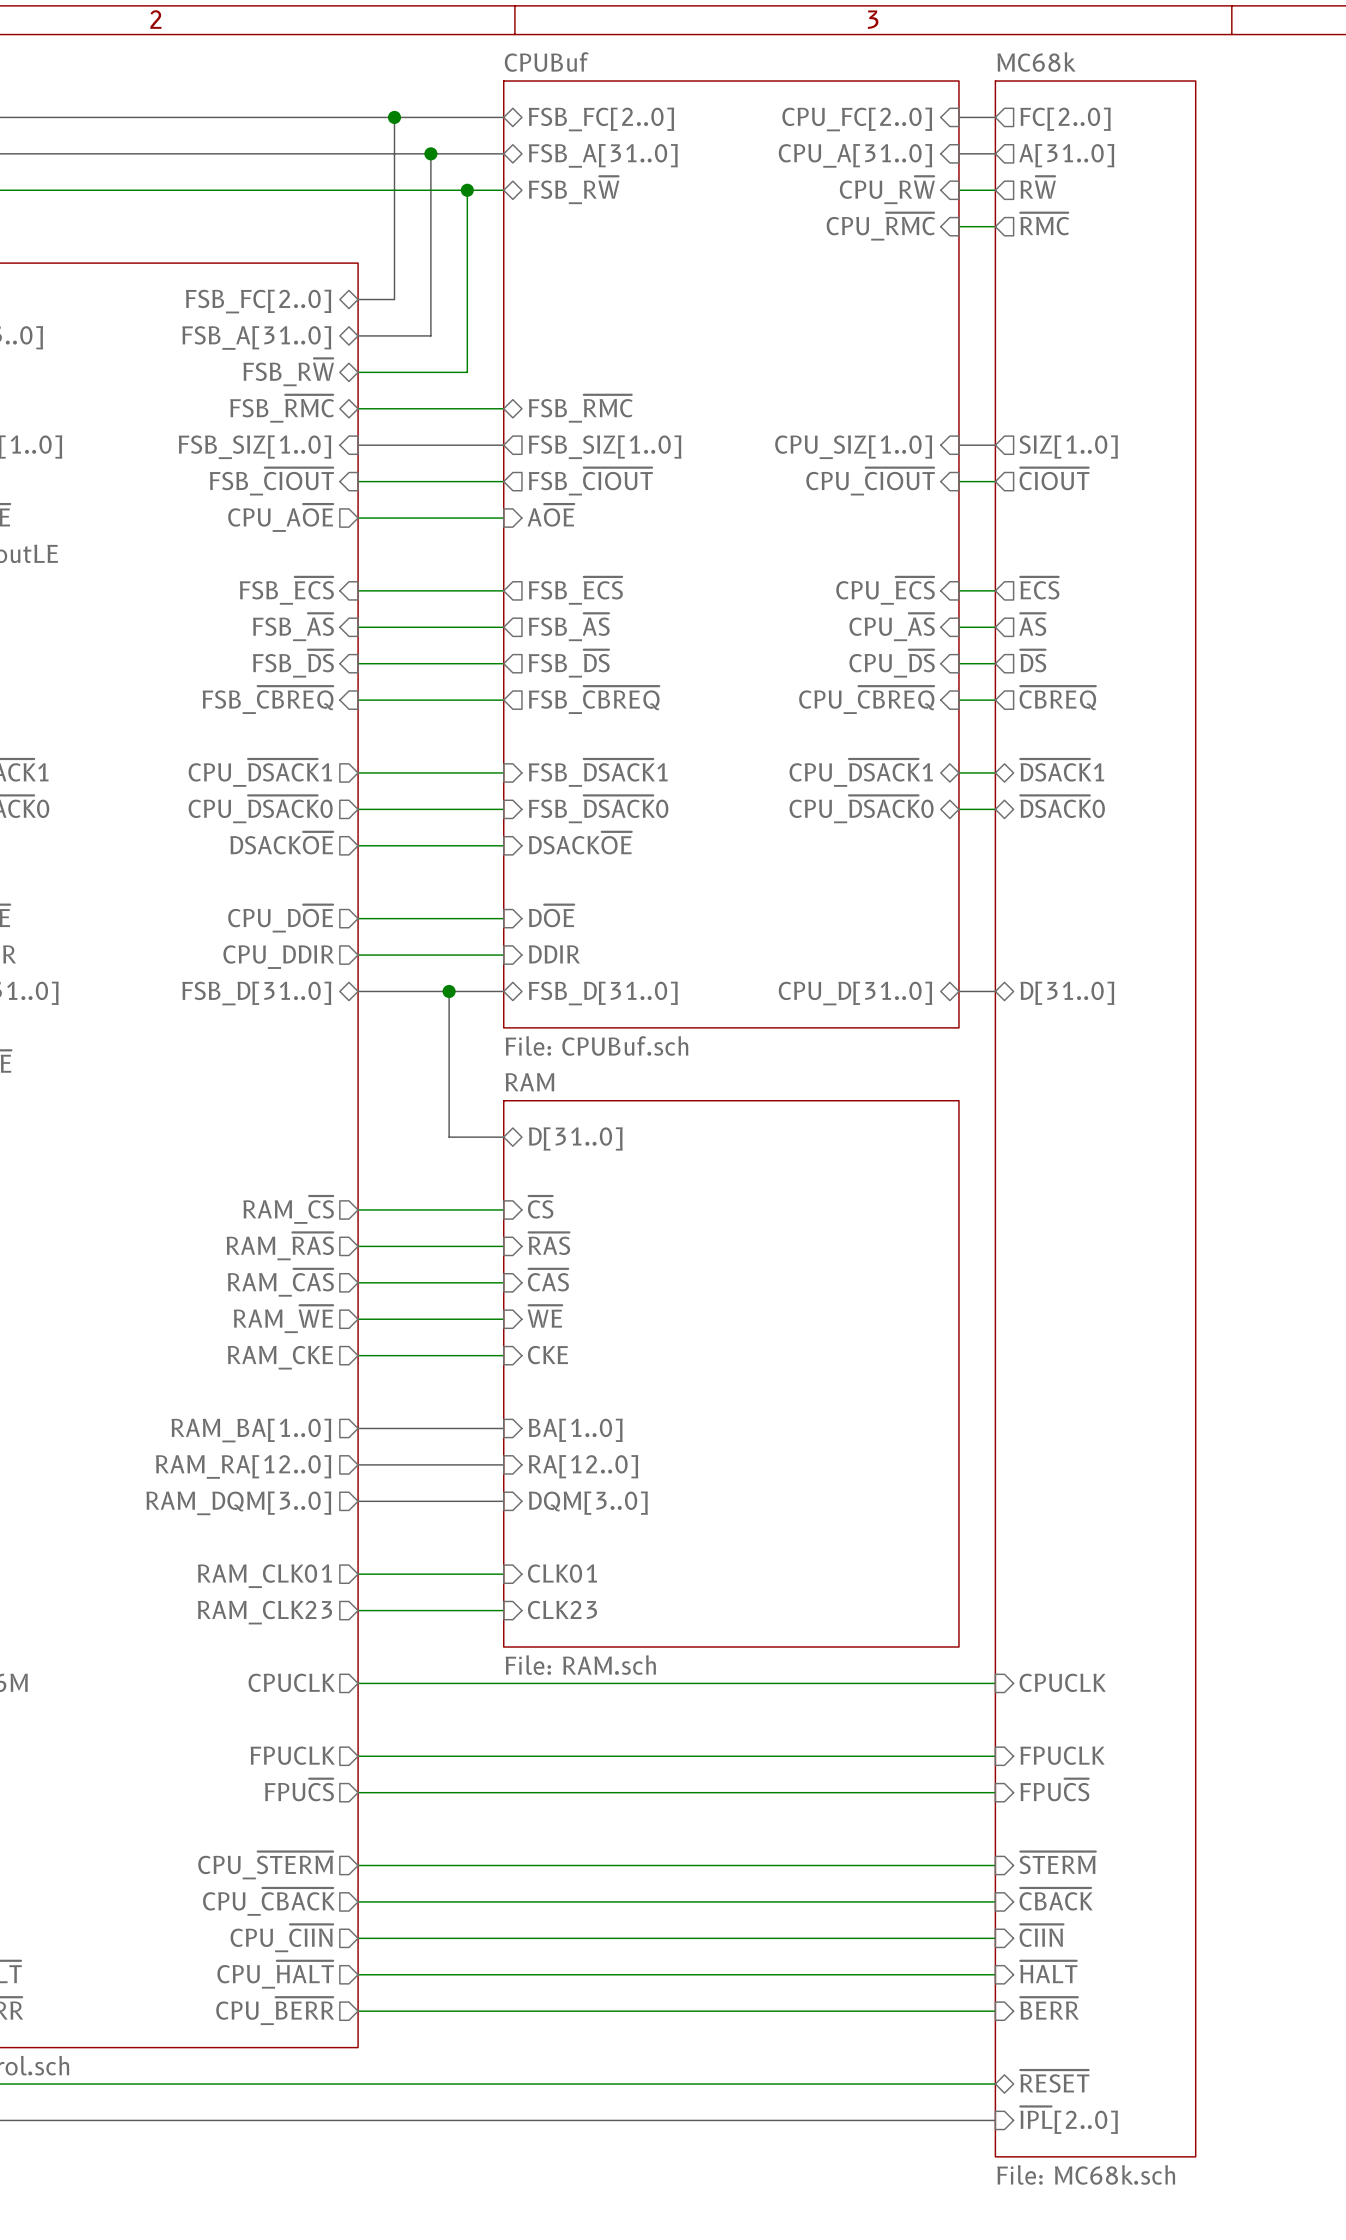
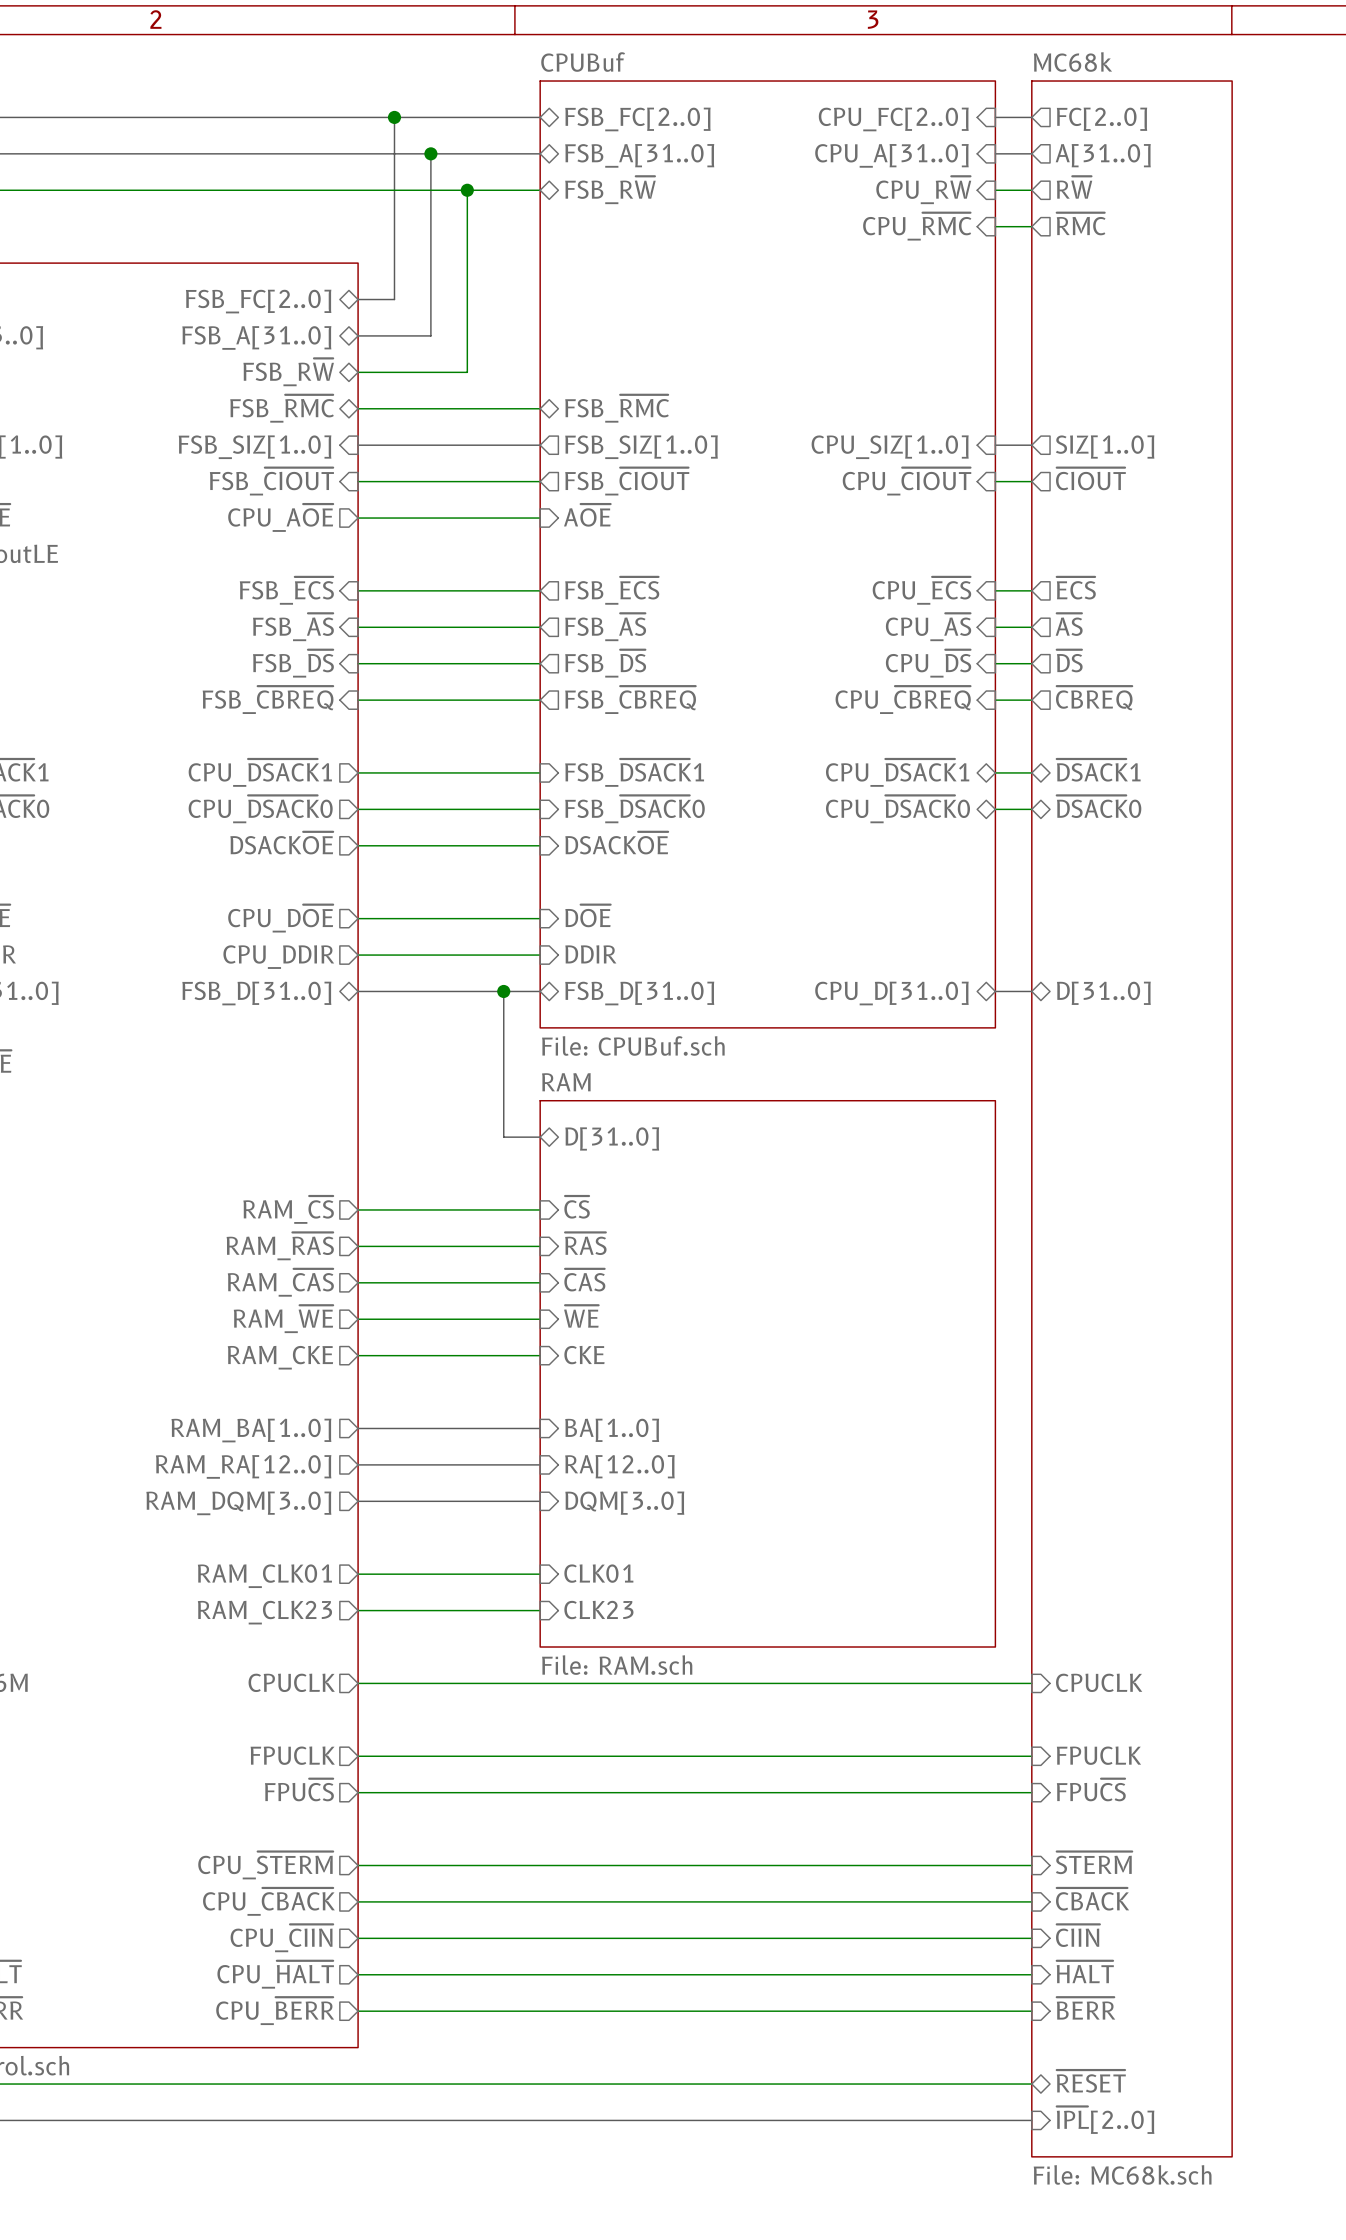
bus: none -> (503, 117) (540, 117)
bus: (958, 117) (995, 117) -> (1031, 117) (995, 117)
sheet pin position: FSB_FC[2..0] (601, 119) -> FSB_FC[2..0] (637, 119)
sheet pin position: CPU_FC[2..0] (857, 119) -> CPU_FC[2..0] (893, 119)
sheet pin position: FC[2..0] (1065, 119) -> FC[2..0] (1102, 119)
bus: none -> (503, 153) (540, 153)
bus: (958, 153) (995, 153) -> (1031, 153) (995, 153)
sheet pin position: FSB_A[31..0] (603, 155) -> FSB_A[31..0] (639, 155)
sheet pin position: CPU_A[31..0] (855, 155) -> CPU_A[31..0] (891, 155)
sheet pin position: A[31..0] (1066, 155) -> A[31..0] (1103, 155)
sheet pin position: R~{W} (1038, 187) -> R~{W} (1074, 187)
wire: none -> (503, 190) (540, 190)
sheet pin position: FSB_R~{W} (574, 190) -> FSB_R~{W} (610, 190)
sheet pin position: CPU_R~{W} (887, 190) -> CPU_R~{W} (923, 190)
wire: (958, 190) (995, 190) -> (1031, 190) (995, 190)
sheet pin position: ~{RMC} (1044, 224) -> ~{RMC} (1081, 224)
sheet pin position: CPU_~{RMC} (880, 226) -> CPU_~{RMC} (917, 226)
wire: (958, 226) (995, 226) -> (1031, 226) (995, 226)
wire: none -> (503, 408) (540, 408)
sheet pin position: FSB_~{RMC} (580, 408) -> FSB_~{RMC} (617, 408)
bus: none -> (503, 445) (540, 445)
bus: (958, 445) (995, 445) -> (1031, 445) (995, 445)
sheet pin position: FSB_SIZ[1..0] (605, 447) -> FSB_SIZ[1..0] (641, 447)
sheet pin position: CPU_SIZ[1..0] (853, 447) -> CPU_SIZ[1..0] (890, 447)
sheet pin position: SIZ[1..0] (1068, 447) -> SIZ[1..0] (1105, 447)
sheet pin position: ~{CIOUT} (1054, 478) -> ~{CIOUT} (1090, 478)
wire: none -> (503, 481) (540, 481)
sheet pin position: FSB_~{CIOUT} (590, 481) -> FSB_~{CIOUT} (627, 481)
sheet pin position: CPU_~{CIOUT} (870, 481) -> CPU_~{CIOUT} (907, 481)
wire: (958, 481) (995, 481) -> (1031, 481) (995, 481)
sheet pin position: A~{OE} (550, 515) -> A~{OE} (587, 515)
wire: none -> (503, 518) (540, 518)
sheet CPUBuf position: (731, 554) -> (767, 554)
sheet pin position: ~{ECS} (1039, 588) -> ~{ECS} (1076, 588)
wire: none -> (503, 590) (540, 590)
sheet pin position: FSB_~{ECS} (575, 590) -> FSB_~{ECS} (612, 590)
sheet pin position: CPU_~{ECS} (885, 590) -> CPU_~{ECS} (921, 590)
wire: (958, 590) (995, 590) -> (1031, 590) (995, 590)
sheet pin position: ~{AS} (1032, 624) -> ~{AS} (1069, 624)
wire: none -> (503, 627) (540, 627)
sheet pin position: FSB_~{AS} (569, 627) -> FSB_~{AS} (605, 627)
sheet pin position: CPU_~{AS} (892, 627) -> CPU_~{AS} (928, 627)
wire: (958, 627) (995, 627) -> (1031, 627) (995, 627)
sheet pin position: ~{DS} (1033, 661) -> ~{DS} (1069, 661)
wire: none -> (503, 663) (540, 663)
sheet pin position: FSB_~{DS} (569, 663) -> FSB_~{DS} (605, 663)
sheet pin position: CPU_~{DS} (892, 663) -> CPU_~{DS} (928, 663)
wire: (958, 663) (995, 663) -> (1031, 663) (995, 663)
sheet pin position: ~{CBREQ} (1057, 698) -> ~{CBREQ} (1094, 698)
wire: none -> (503, 700) (540, 700)
sheet pin position: FSB_~{CBREQ} (594, 700) -> FSB_~{CBREQ} (630, 700)
sheet pin position: CPU_~{CBREQ} (866, 700) -> CPU_~{CBREQ} (903, 700)
wire: (958, 700) (995, 700) -> (1031, 700) (995, 700)
sheet pin position: ~{DSACK}1 (1062, 770) -> ~{DSACK}1 (1098, 770)
wire: none -> (503, 772) (540, 772)
sheet pin position: FSB_~{DSACK}1 (598, 772) -> FSB_~{DSACK}1 (634, 772)
sheet pin position: CPU_~{DSACK}1 (861, 772) -> CPU_~{DSACK}1 (897, 772)
wire: (958, 772) (995, 772) -> (1031, 772) (995, 772)
sheet pin position: ~{DSACK}0 (1062, 806) -> ~{DSACK}0 (1099, 806)
wire: none -> (503, 809) (540, 809)
sheet pin position: FSB_~{DSACK}0 (598, 809) -> FSB_~{DSACK}0 (634, 809)
sheet pin position: CPU_~{DSACK}0 (861, 809) -> CPU_~{DSACK}0 (897, 809)
wire: (958, 809) (995, 809) -> (1031, 809) (995, 809)
sheet pin position: DSACK~{OE} (580, 843) -> DSACK~{OE} (616, 843)
wire: none -> (503, 845) (540, 845)
sheet pin position: D~{OE} (551, 915) -> D~{OE} (587, 915)
wire: none -> (503, 918) (540, 918)
sheet pin position: DDIR (554, 954) -> DDIR (590, 954)
wire: none -> (503, 955) (540, 955)
bus: (449, 991) (449, 1137) (503, 1137) -> none
junction position: (449, 991) -> (503, 991)
bus: none -> (540, 991) (503, 991) (503, 1137) (540, 1137)
bus: (958, 991) (995, 991) -> (1031, 991) (995, 991)
sheet pin position: FSB_D[31..0] (603, 993) -> FSB_D[31..0] (639, 993)
sheet pin position: CPU_D[31..0] (855, 993) -> CPU_D[31..0] (891, 993)
sheet pin position: D[31..0] (1067, 993) -> D[31..0] (1103, 993)
sheet MC68k position: (1095, 1118) -> (1131, 1118)
sheet pin position: D[31..0] (575, 1138) -> D[31..0] (612, 1138)
sheet pin position: ~{CS} (540, 1207) -> ~{CS} (577, 1207)
wire: none -> (503, 1209) (540, 1209)
sheet pin position: ~{RAS} (549, 1243) -> ~{RAS} (585, 1243)
wire: none -> (503, 1246) (540, 1246)
sheet pin position: ~{CAS} (548, 1280) -> ~{CAS} (584, 1280)
wire: none -> (503, 1282) (540, 1282)
sheet pin position: ~{WE} (544, 1316) -> ~{WE} (581, 1316)
wire: none -> (503, 1319) (540, 1319)
wire: none -> (503, 1355) (540, 1355)
sheet pin position: CKE (548, 1355) -> CKE (584, 1355)
sheet RAM position: (731, 1373) -> (767, 1373)
bus: none -> (503, 1428) (540, 1428)
sheet pin position: BA[1..0] (575, 1430) -> BA[1..0] (612, 1430)
bus: none -> (503, 1464) (540, 1464)
sheet pin position: RA[12..0] (583, 1466) -> RA[12..0] (619, 1466)
bus: none -> (503, 1501) (540, 1501)
sheet pin position: DQM[3..0] (588, 1503) -> DQM[3..0] (624, 1503)
sheet pin position: CLK01 (562, 1573) -> CLK01 (598, 1573)
wire: none -> (503, 1574) (540, 1574)
wire: none -> (503, 1610) (540, 1610)
sheet pin position: CLK23 (562, 1610) -> CLK23 (598, 1610)
sheet pin position: CPUCLK (1062, 1682) -> CPUCLK (1099, 1682)
wire: none -> (995, 1683) (1031, 1683)
sheet pin position: FPUCLK (1062, 1755) -> FPUCLK (1098, 1755)
wire: none -> (995, 1756) (1031, 1756)
sheet pin position: FPU~{CS} (1054, 1790) -> FPU~{CS} (1091, 1790)
wire: none -> (995, 1792) (1031, 1792)
sheet pin position: ~{STERM} (1057, 1862) -> ~{STERM} (1094, 1862)
wire: none -> (995, 1865) (1031, 1865)
sheet pin position: ~{CBACK} (1056, 1899) -> ~{CBACK} (1092, 1899)
wire: none -> (995, 1901) (1031, 1901)
sheet pin position: ~{CIIN} (1041, 1935) -> ~{CIIN} (1077, 1935)
wire: none -> (995, 1938) (1031, 1938)
sheet pin position: ~{HALT} (1048, 1971) -> ~{HALT} (1085, 1971)
wire: none -> (995, 1974) (1031, 1974)
sheet pin position: ~{BERR} (1049, 2008) -> ~{BERR} (1085, 2008)
wire: none -> (995, 2011) (1031, 2011)
sheet pin position: ~{RESET} (1054, 2081) -> ~{RESET} (1091, 2081)
wire: none -> (995, 2084) (1031, 2084)
bus: none -> (995, 2120) (1031, 2120)
sheet pin position: ~{IPL}[2..0] (1069, 2120) -> ~{IPL}[2..0] (1105, 2120)

